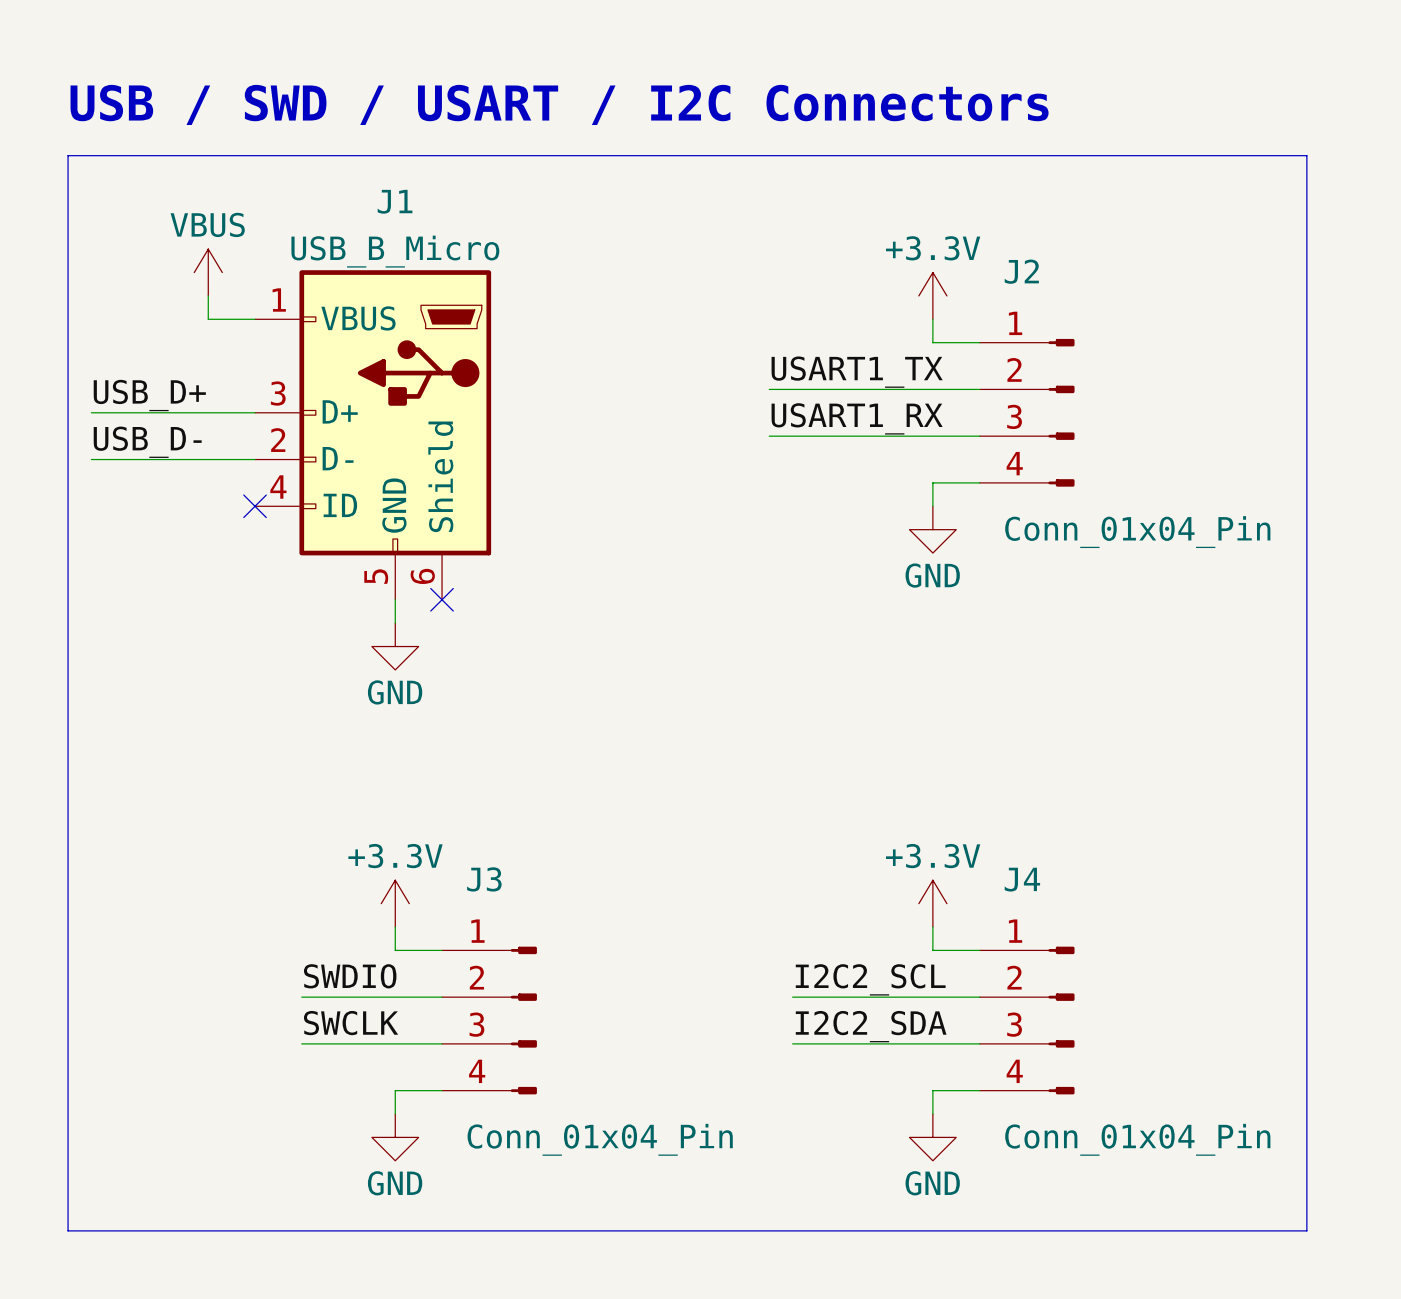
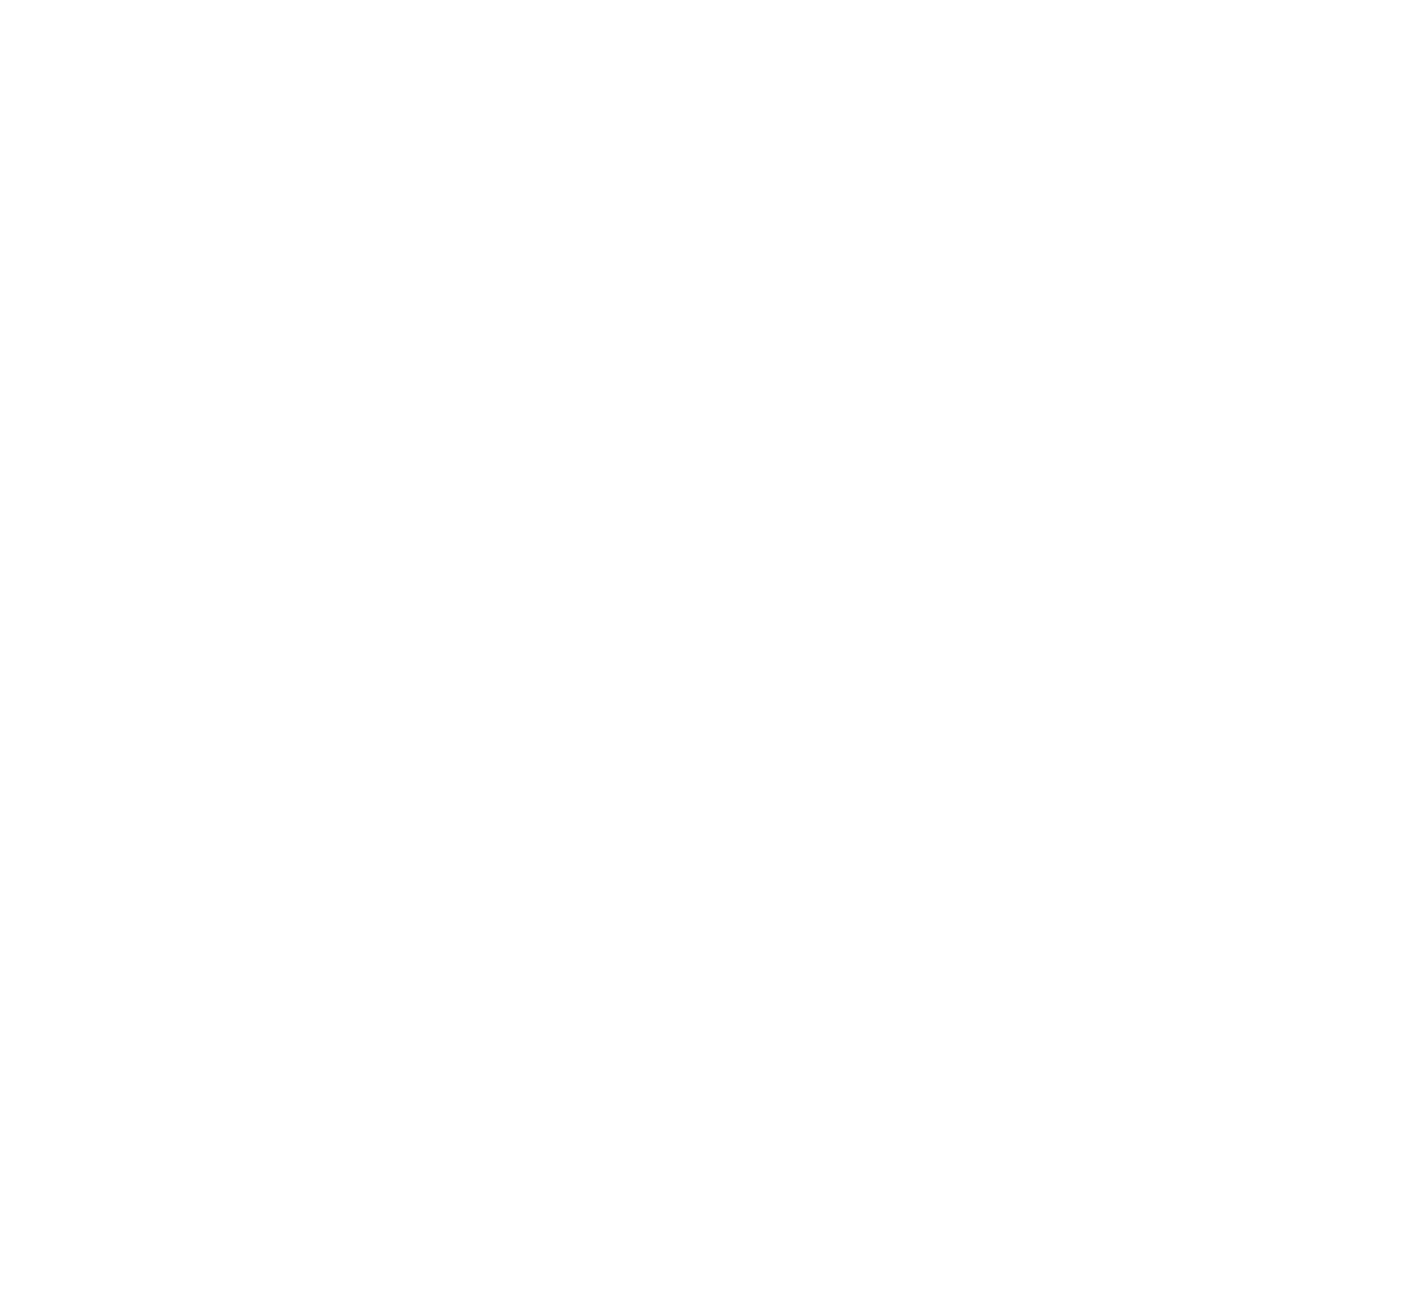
text: USB / SWD / USART / I2C Connectors (559, 104) -> none
line: (68, 155) (1306, 155) (1306, 1230) (68, 1230) (68, 155) -> none
power symbol: VBUS (208, 272) -> none
wire: (208, 295) (208, 319) (255, 319) -> none
power symbol: +3.3V (932, 295) -> none
wire: (932, 319) (932, 342) (979, 342) -> none
label: USART1_TX (857, 372) -> none
wire: (769, 389) (979, 389) -> none
label: USB_D+ (149, 395) -> none
wire: (91, 412) (255, 412) -> none
J2: Conn_01x04_Pin (1027, 412) -> none
label: USART1_RX (857, 418) -> none
J1: USB_B_Micro (373, 435) -> none
wire: (769, 436) (979, 436) -> none
label: USB_D- (147, 442) -> none
wire: (91, 459) (255, 459) -> none
wire: (979, 482) (932, 482) (932, 506) -> none
no-connect mark: (255, 506) -> none
power symbol: GND (932, 529) -> none
wire: (395, 599) (395, 623) -> none
no-connect mark: (442, 599) -> none
power symbol: GND (395, 646) -> none
power symbol: +3.3V (395, 903) -> none
power symbol: +3.3V (932, 903) -> none
wire: (395, 927) (395, 950) (442, 950) -> none
wire: (932, 927) (932, 950) (979, 950) -> none
label: SWDIO (350, 976) -> none
label: I2C2_SCL (870, 979) -> none
wire: (301, 997) (442, 997) -> none
wire: (792, 997) (979, 997) -> none
J3: Conn_01x04_Pin (489, 1020) -> none
J4: Conn_01x04_Pin (1027, 1020) -> none
label: SWCLK (351, 1023) -> none
label: I2C2_SDA (871, 1026) -> none
wire: (301, 1043) (442, 1043) -> none
wire: (792, 1043) (979, 1043) -> none
wire: (442, 1090) (395, 1090) (395, 1114) -> none
wire: (979, 1090) (932, 1090) (932, 1114) -> none
power symbol: GND (395, 1137) -> none
power symbol: GND (932, 1137) -> none

